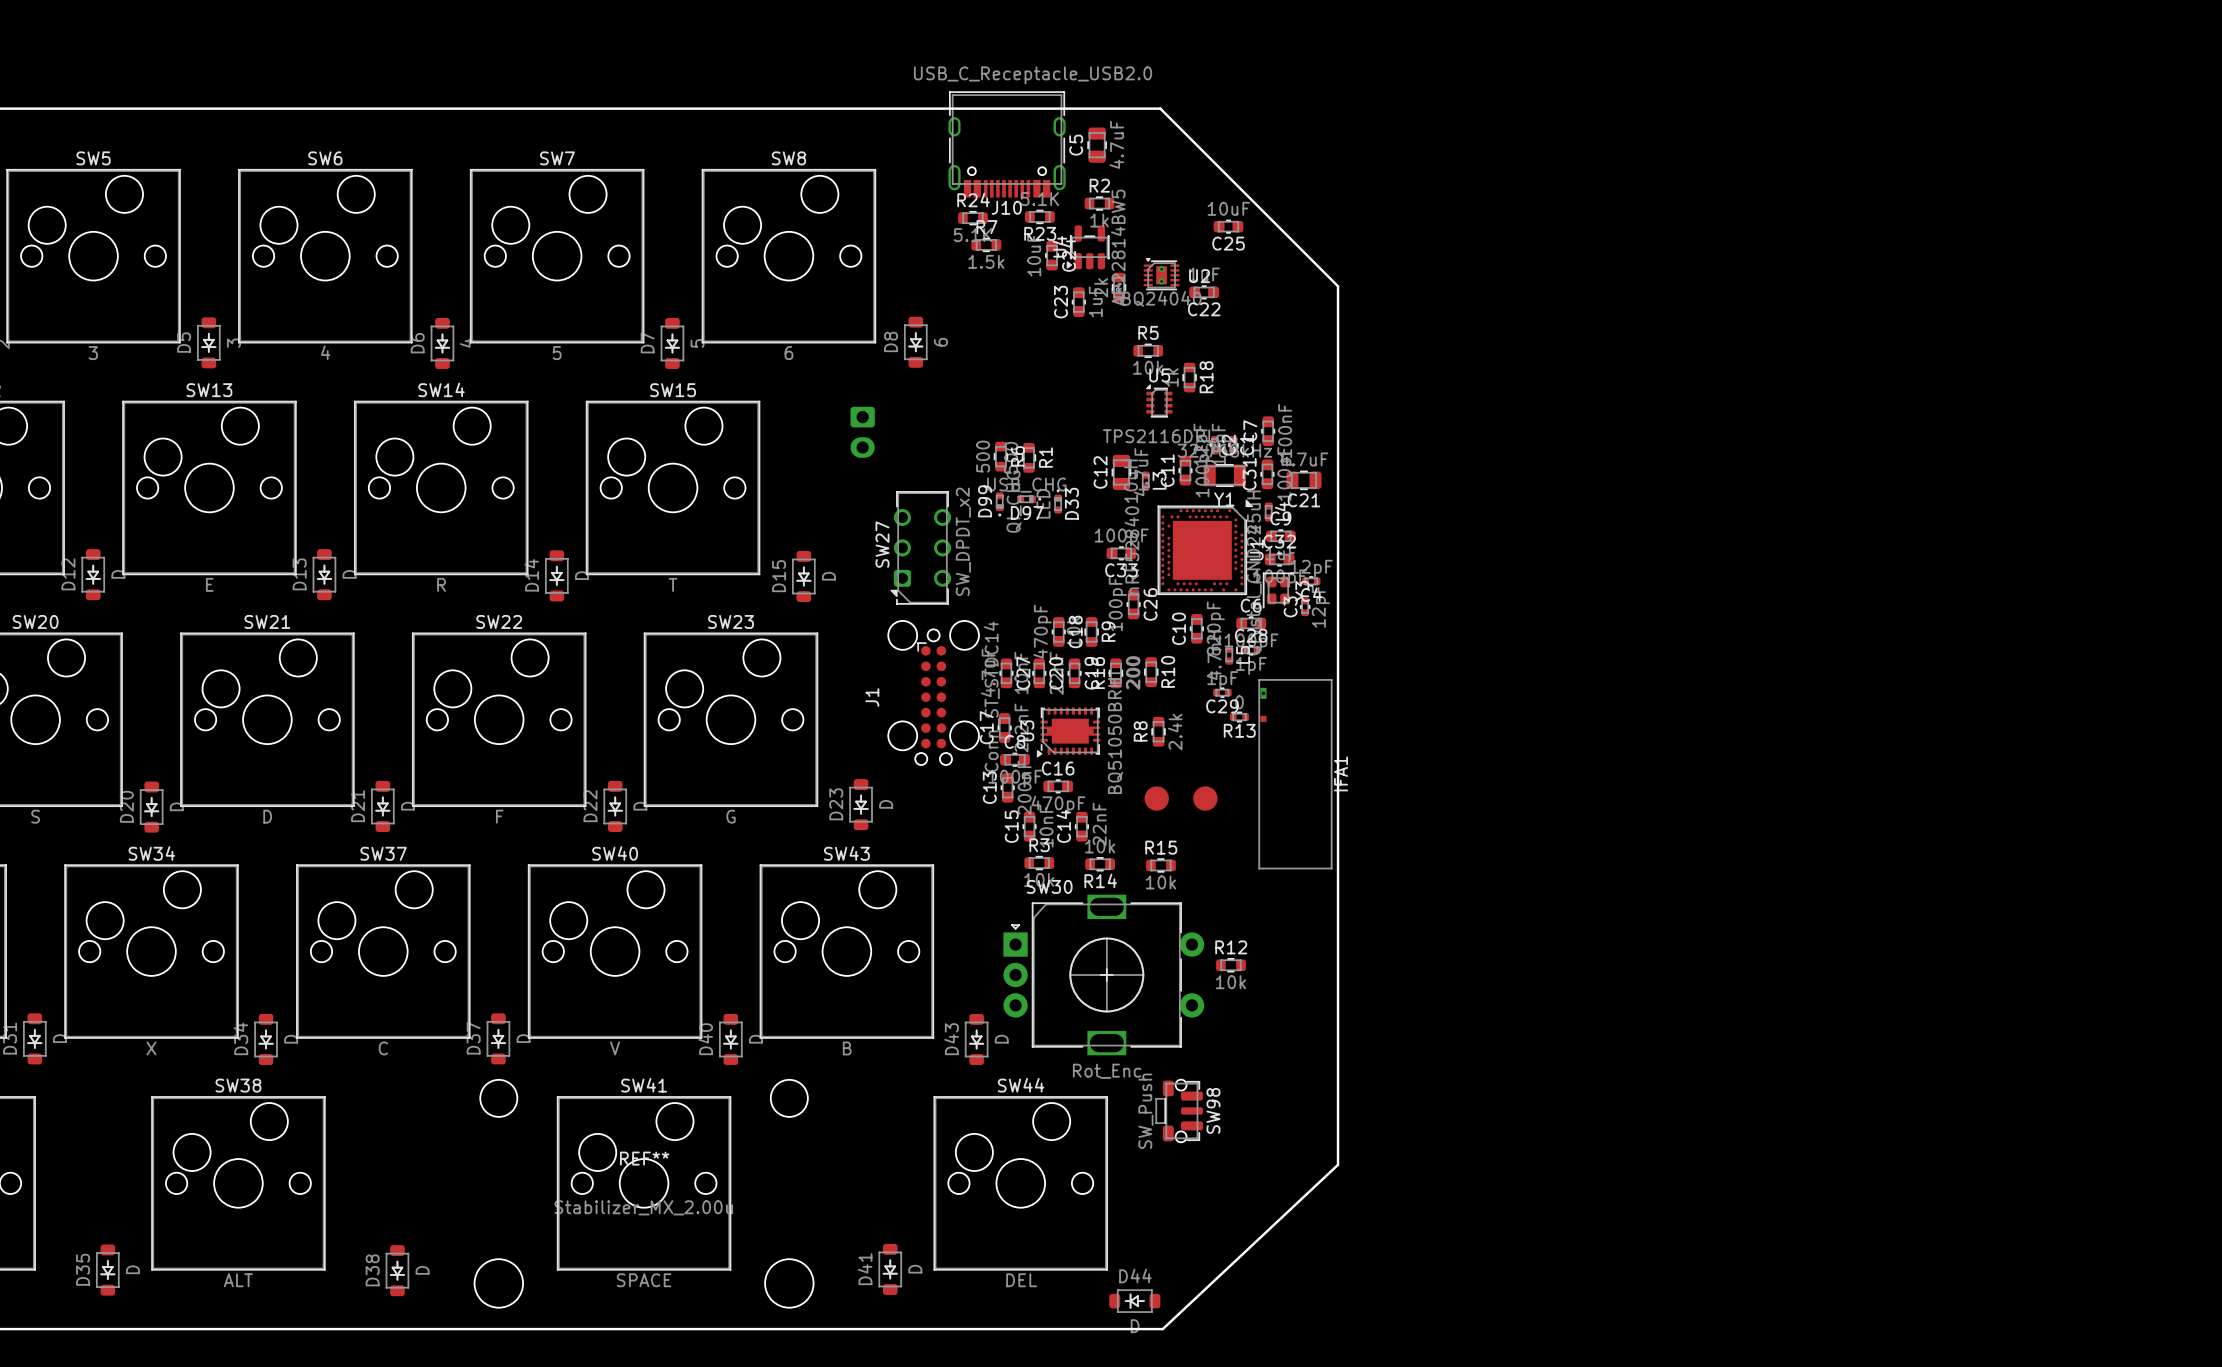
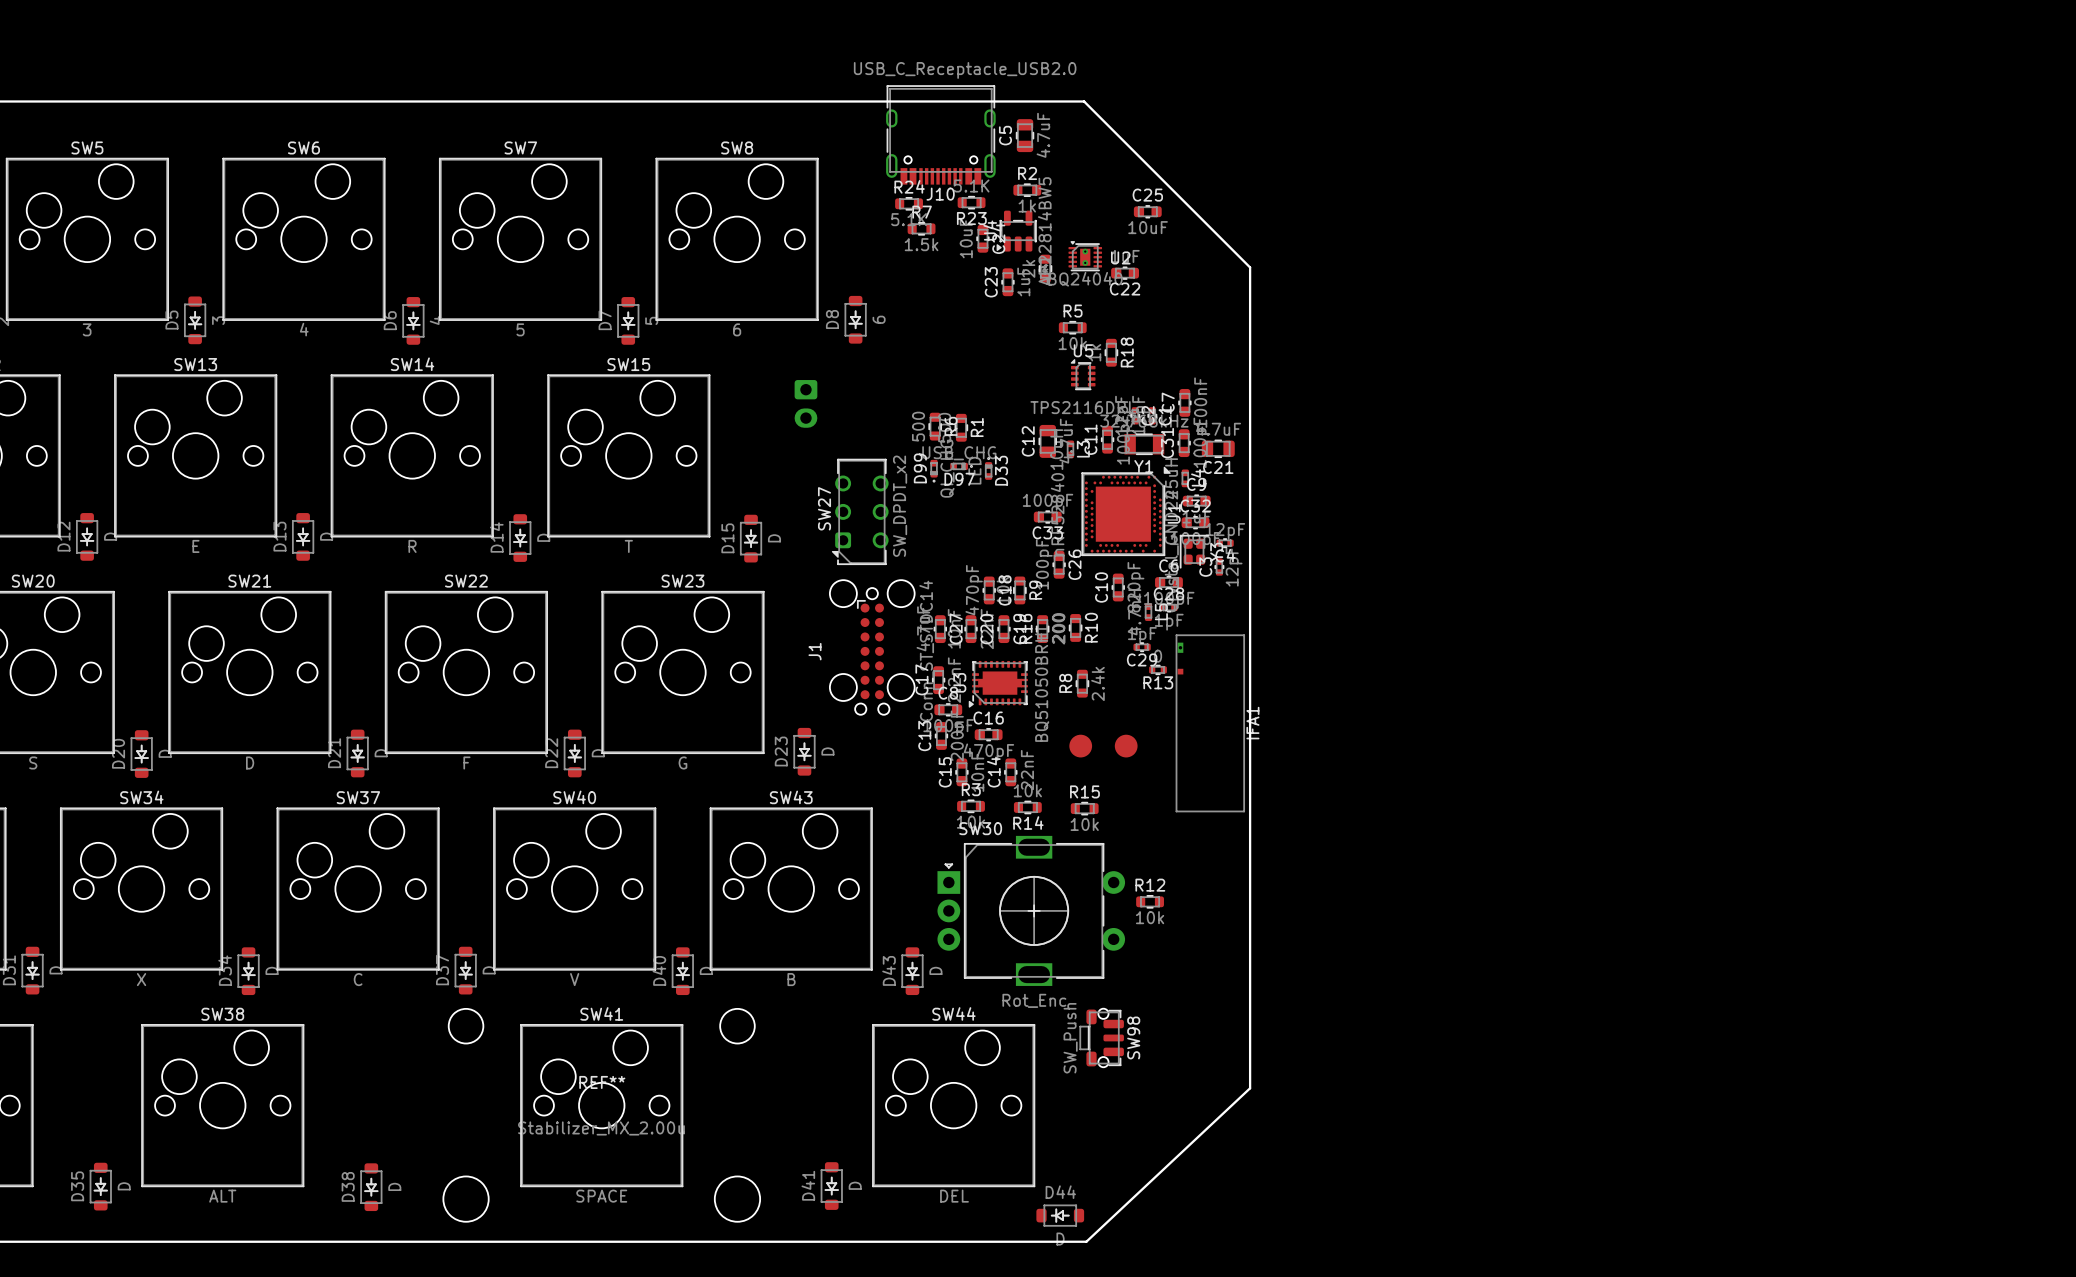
C25 value position: 10uF (1228, 208) -> 10uF (1148, 227)
C25 name position: C25 (1228, 243) -> C25 (1147, 195)

